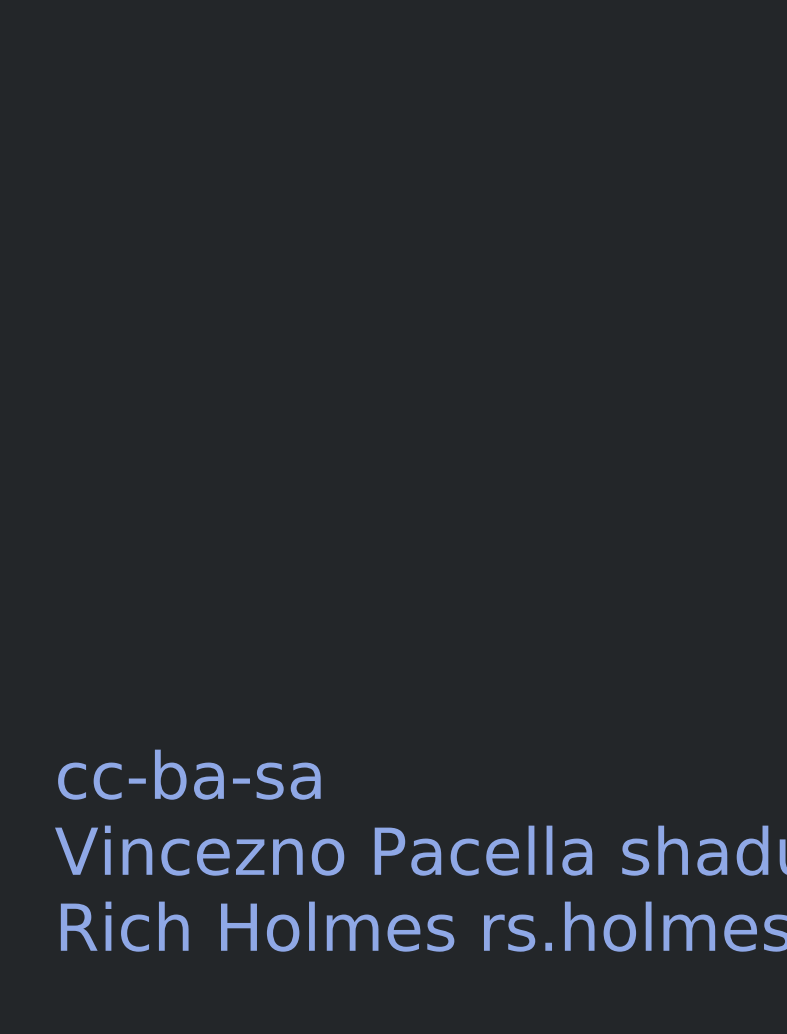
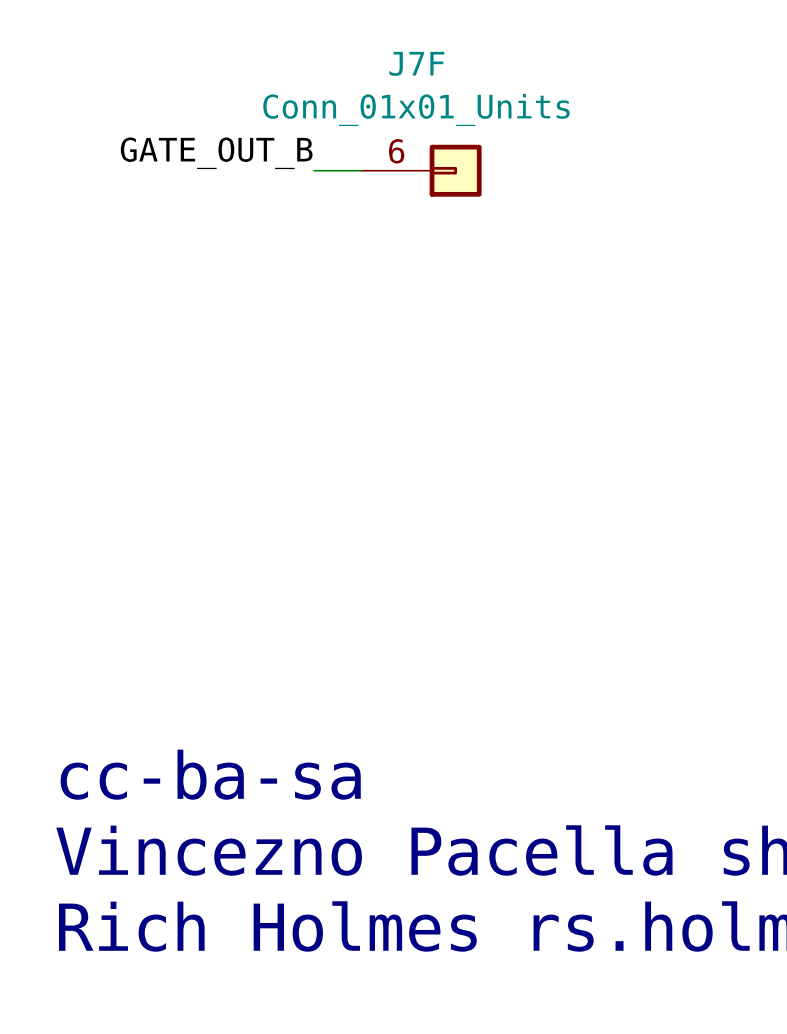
label: none -> GATE_OUT_B (216, 153)
wire: none -> (314, 170) (361, 170)
J7F: none -> Conn_01x01_Units (421, 170)

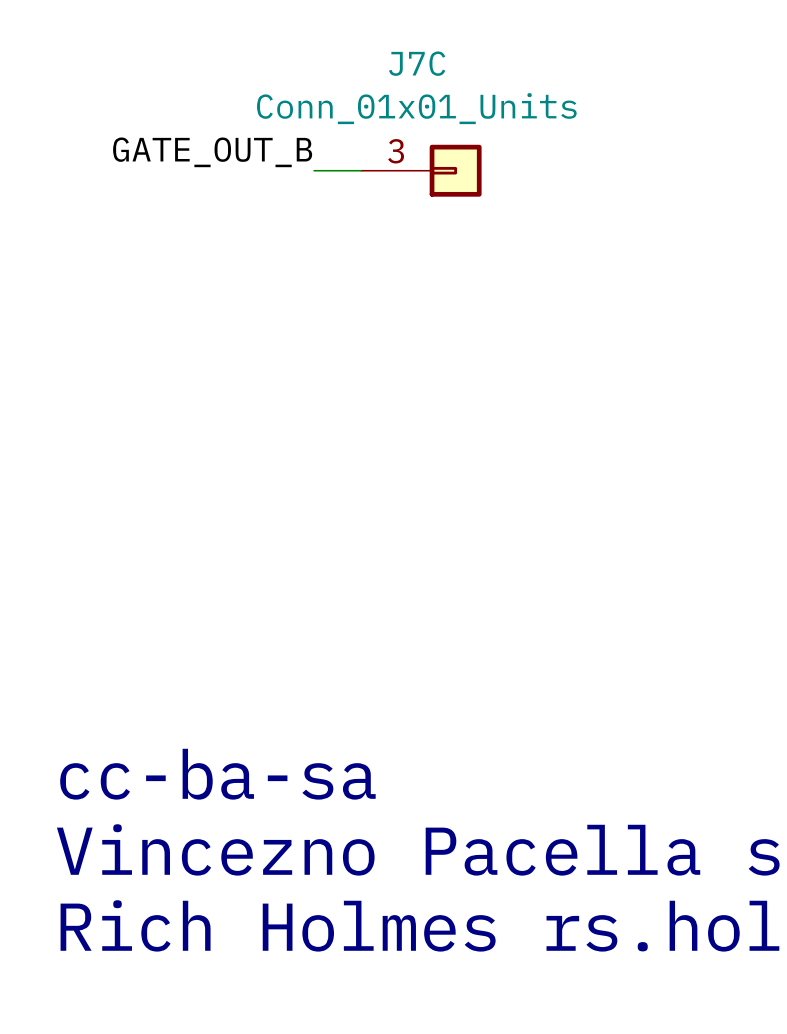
J7F name: J7F (416, 63) -> J7C (417, 63)
J7F pin number: 6 (396, 151) -> 3 (396, 151)

